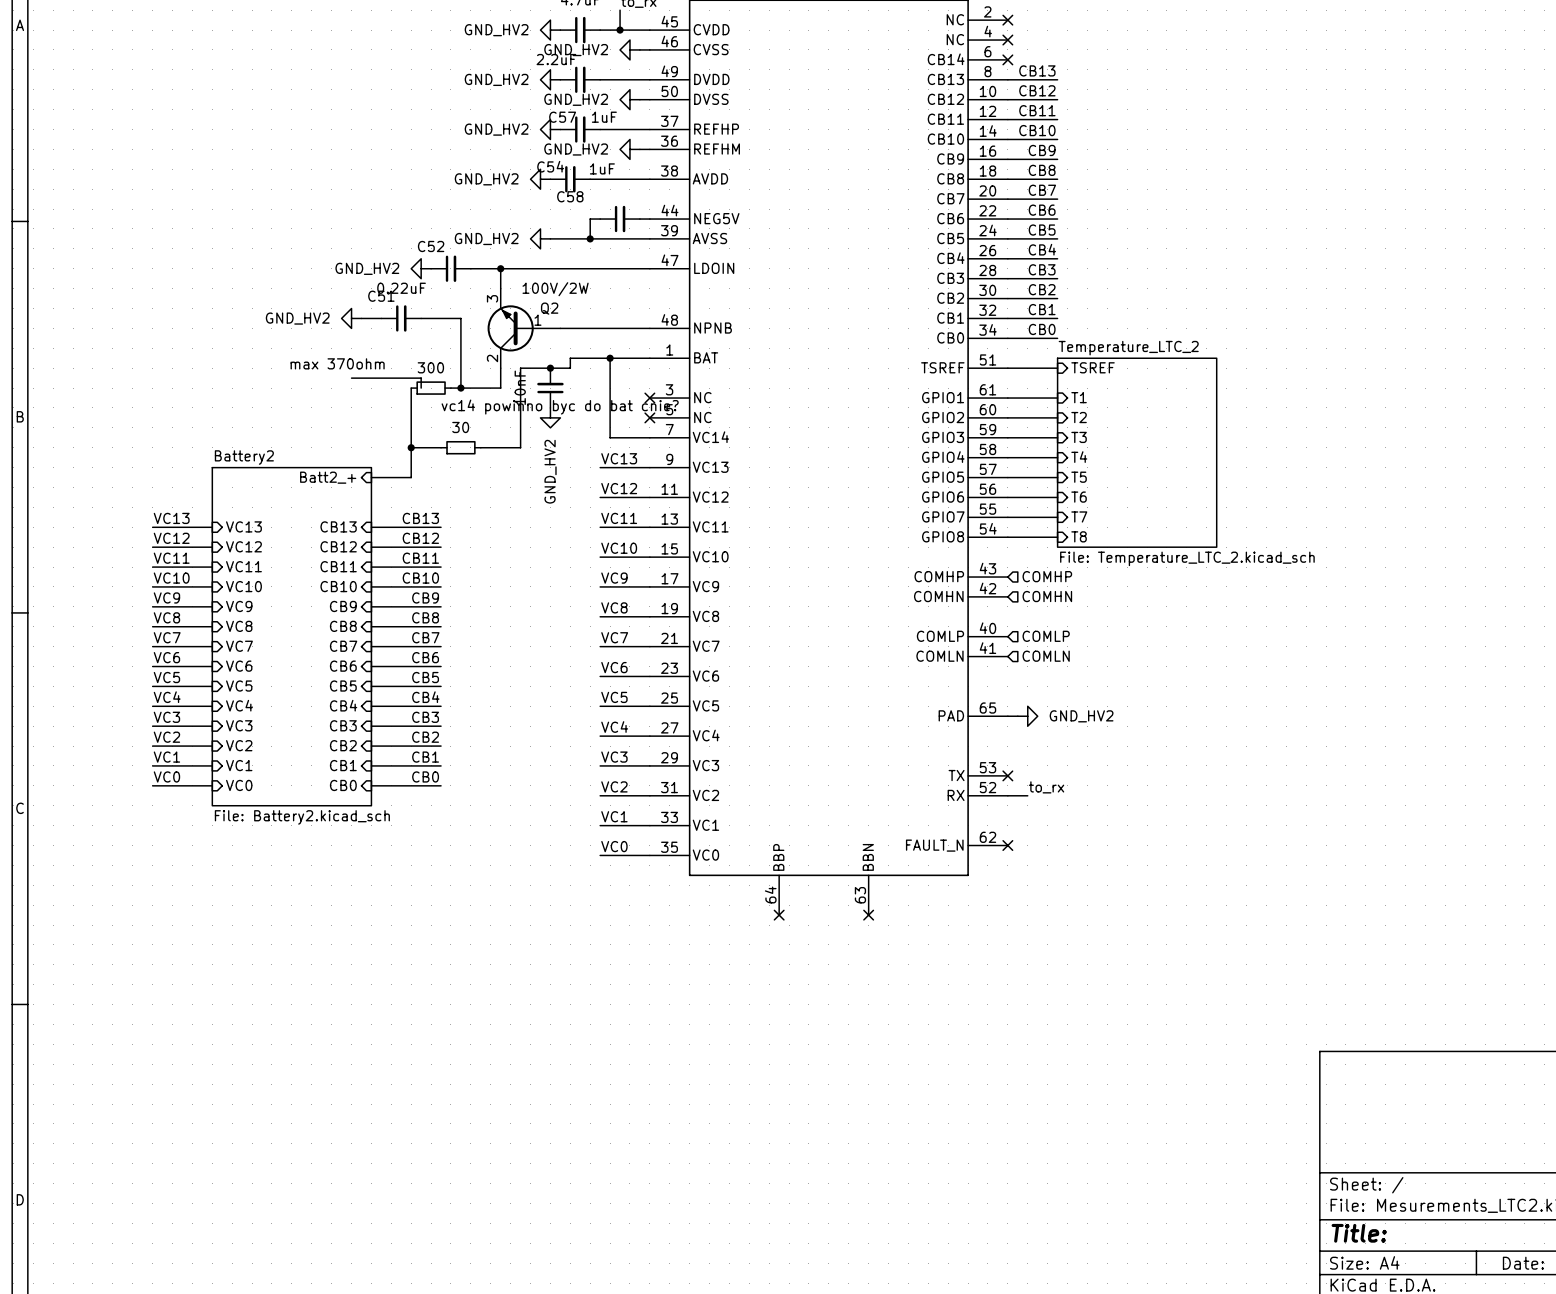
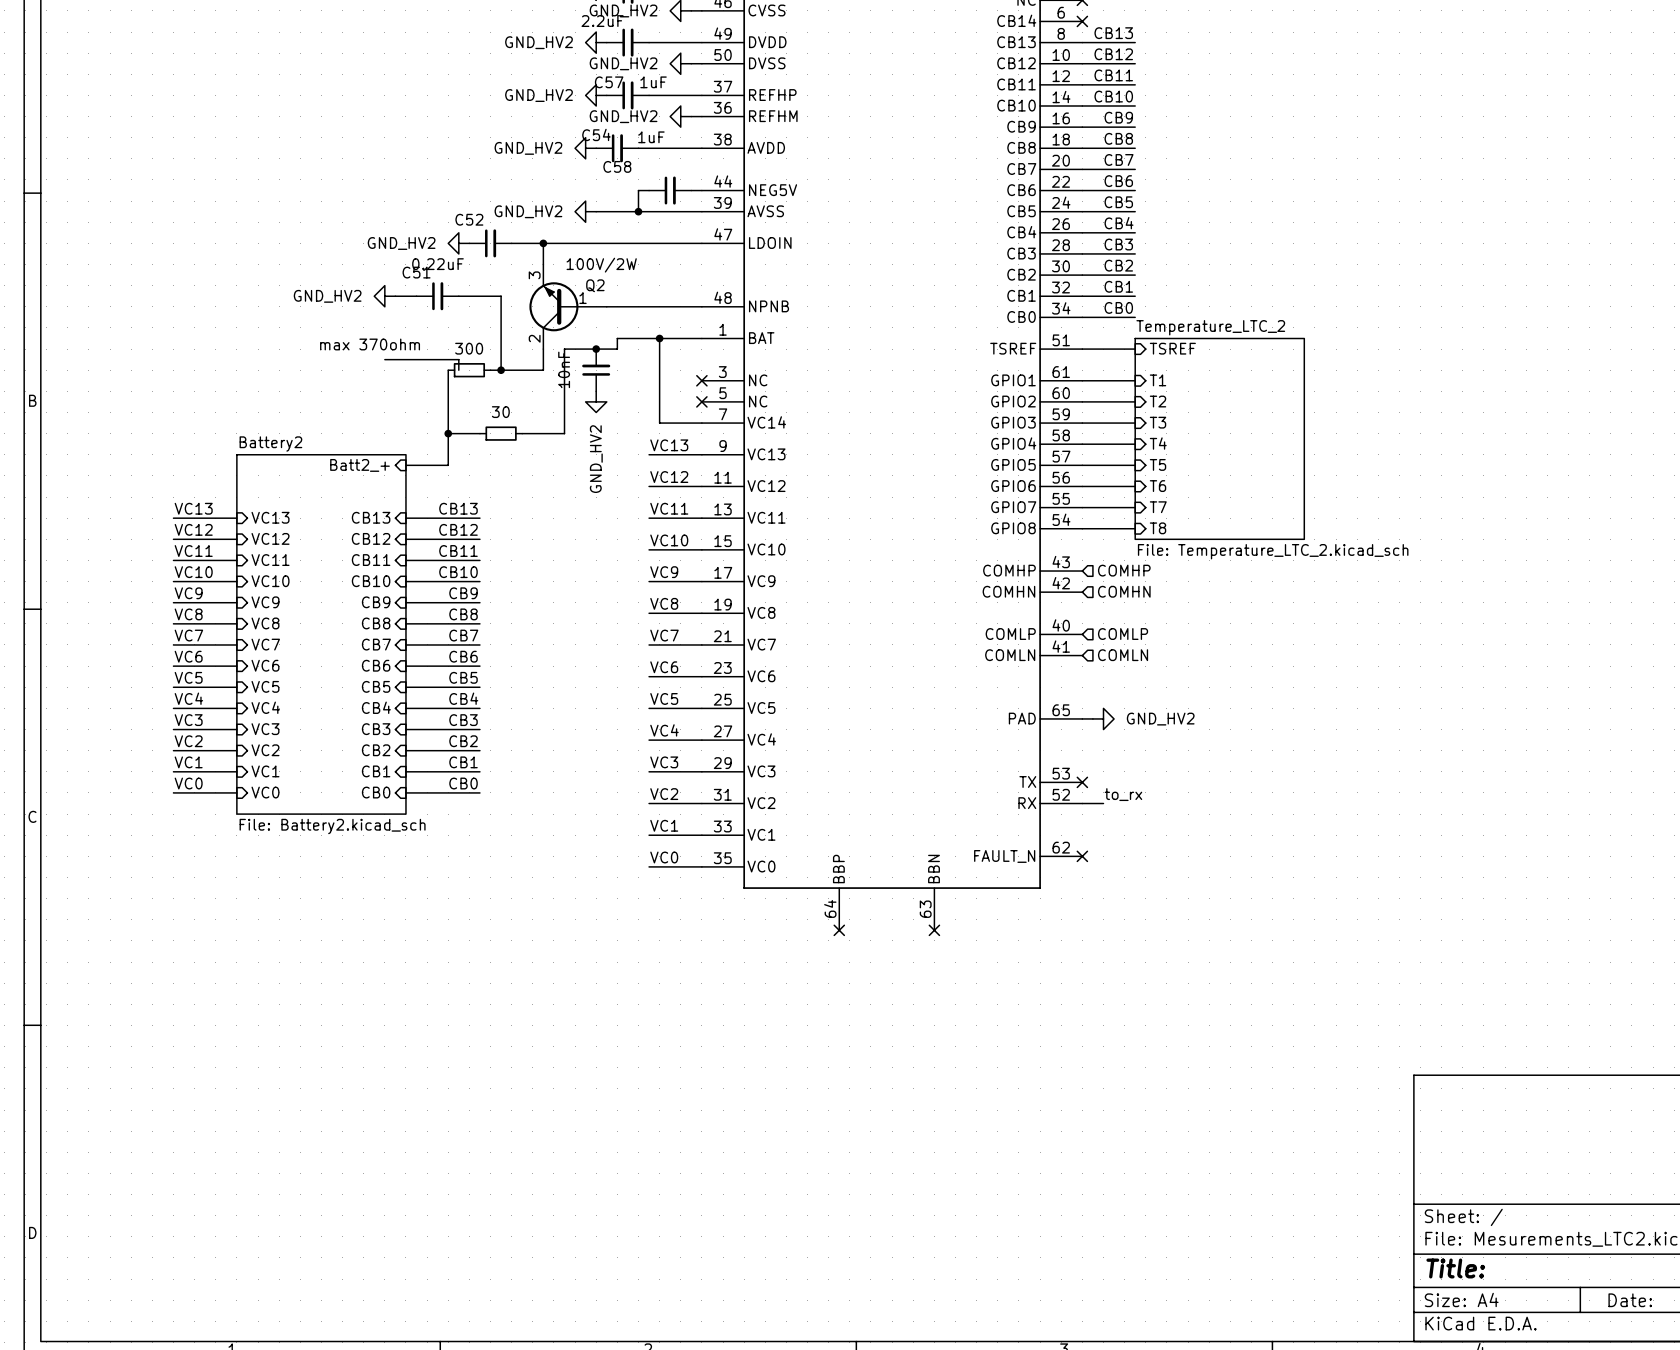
text: vc14 powinno byc do bat cnie? (560, 407) -> none

